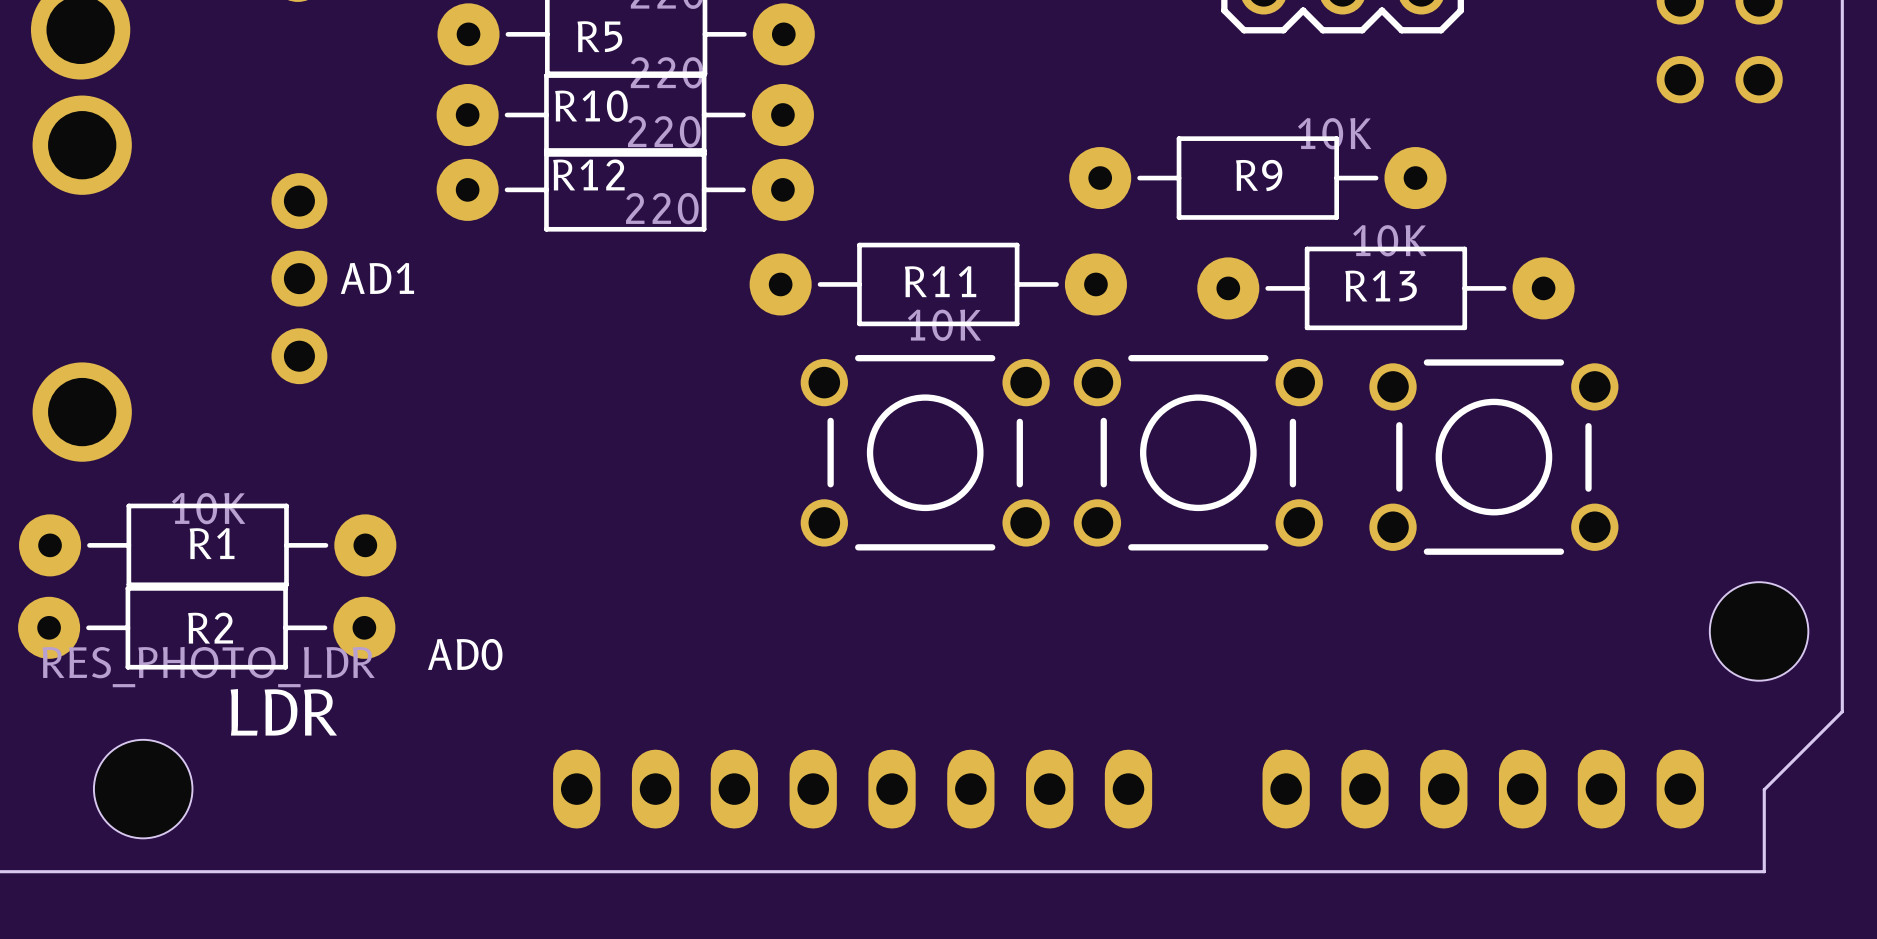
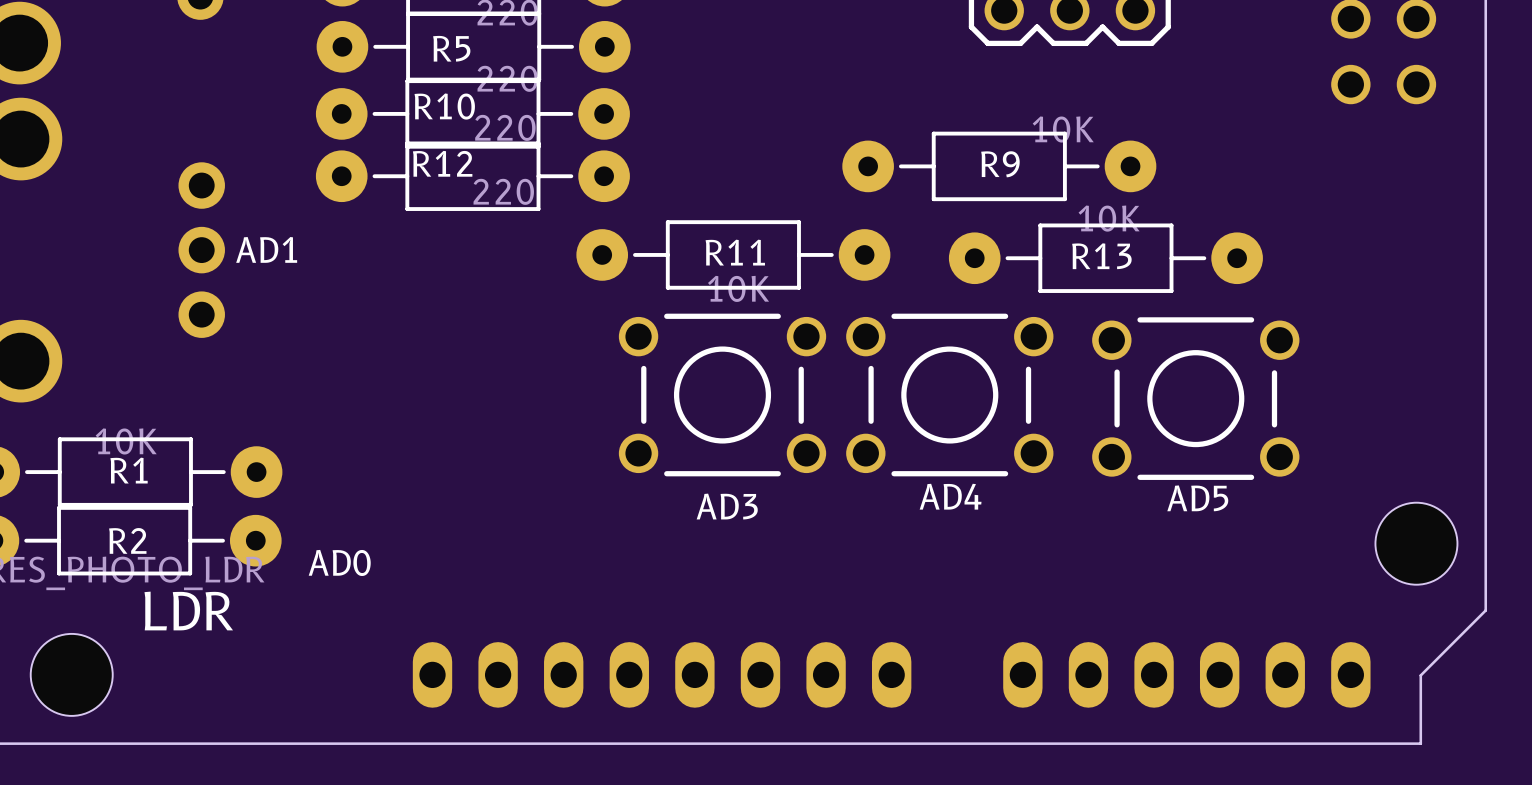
text: none -> AD4 (950, 496)
text: none -> AD5 (1197, 498)
text: none -> AD3 (727, 506)

